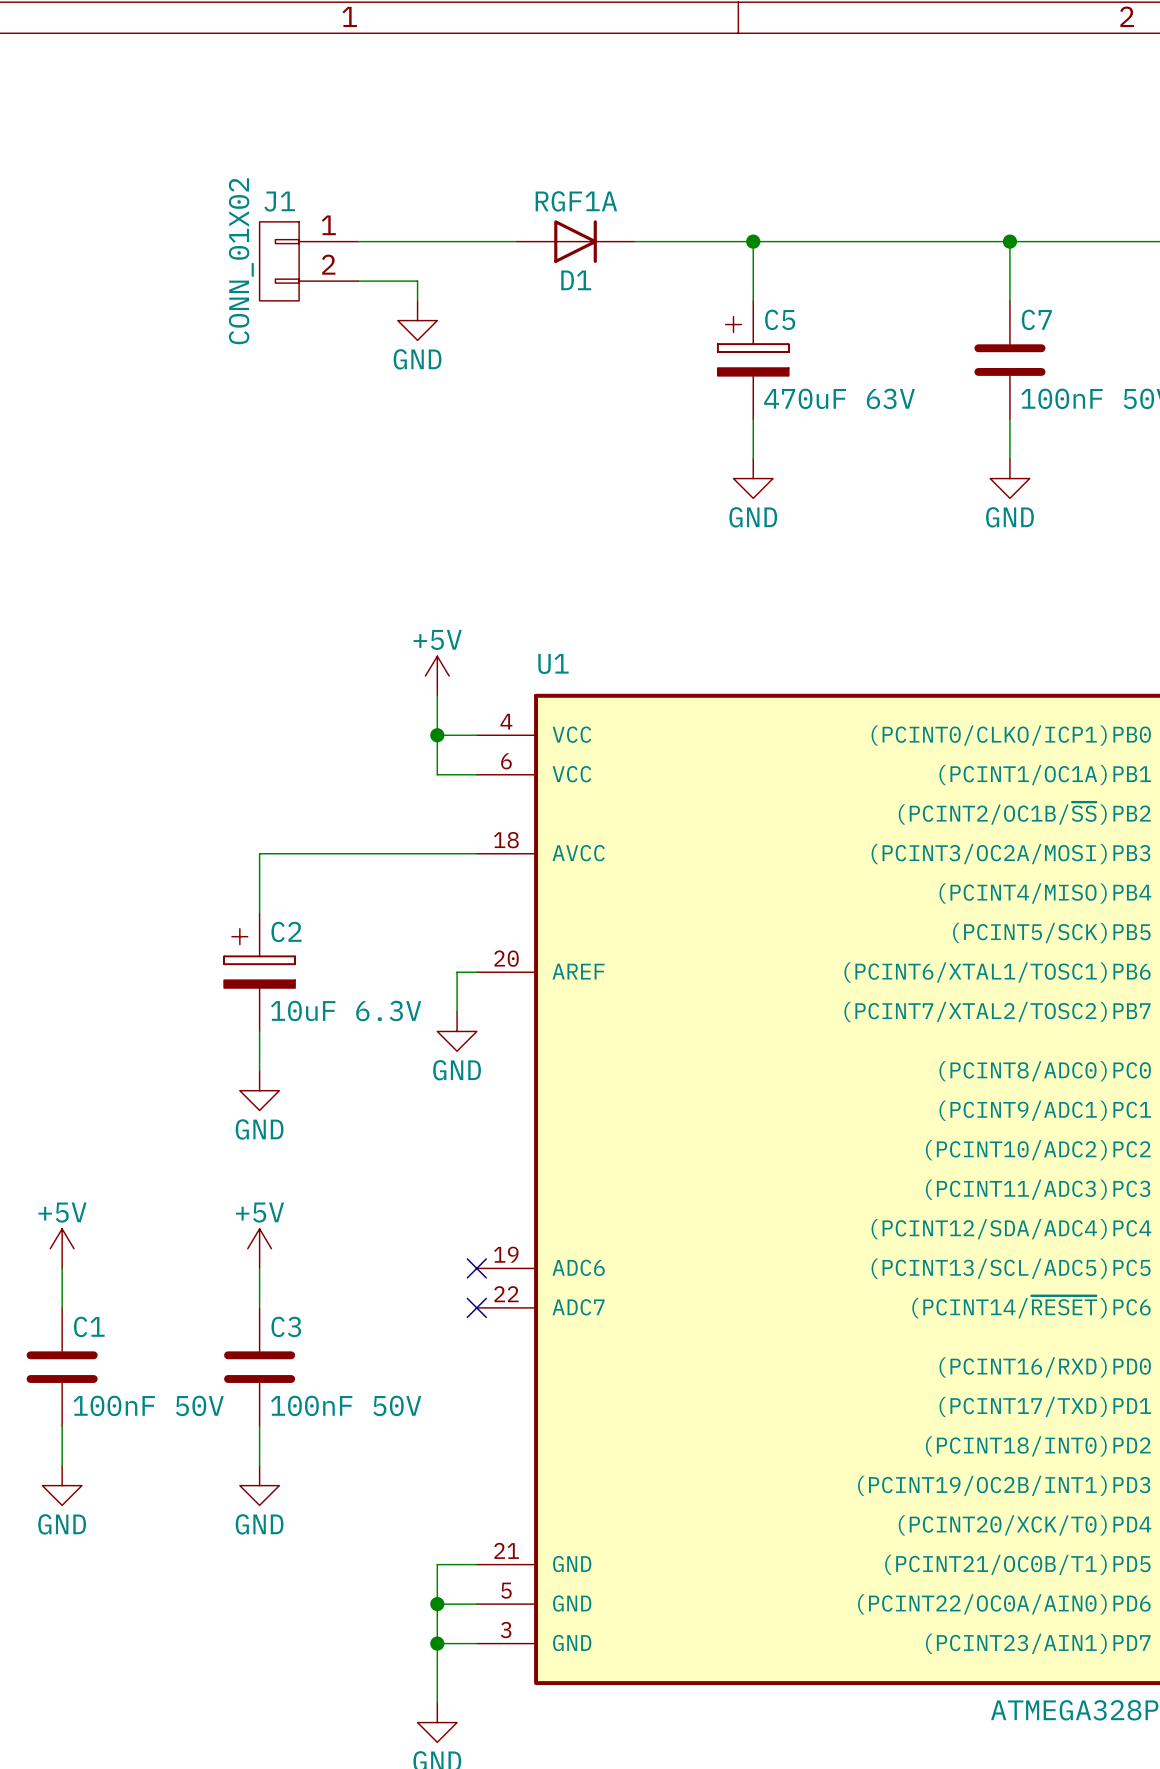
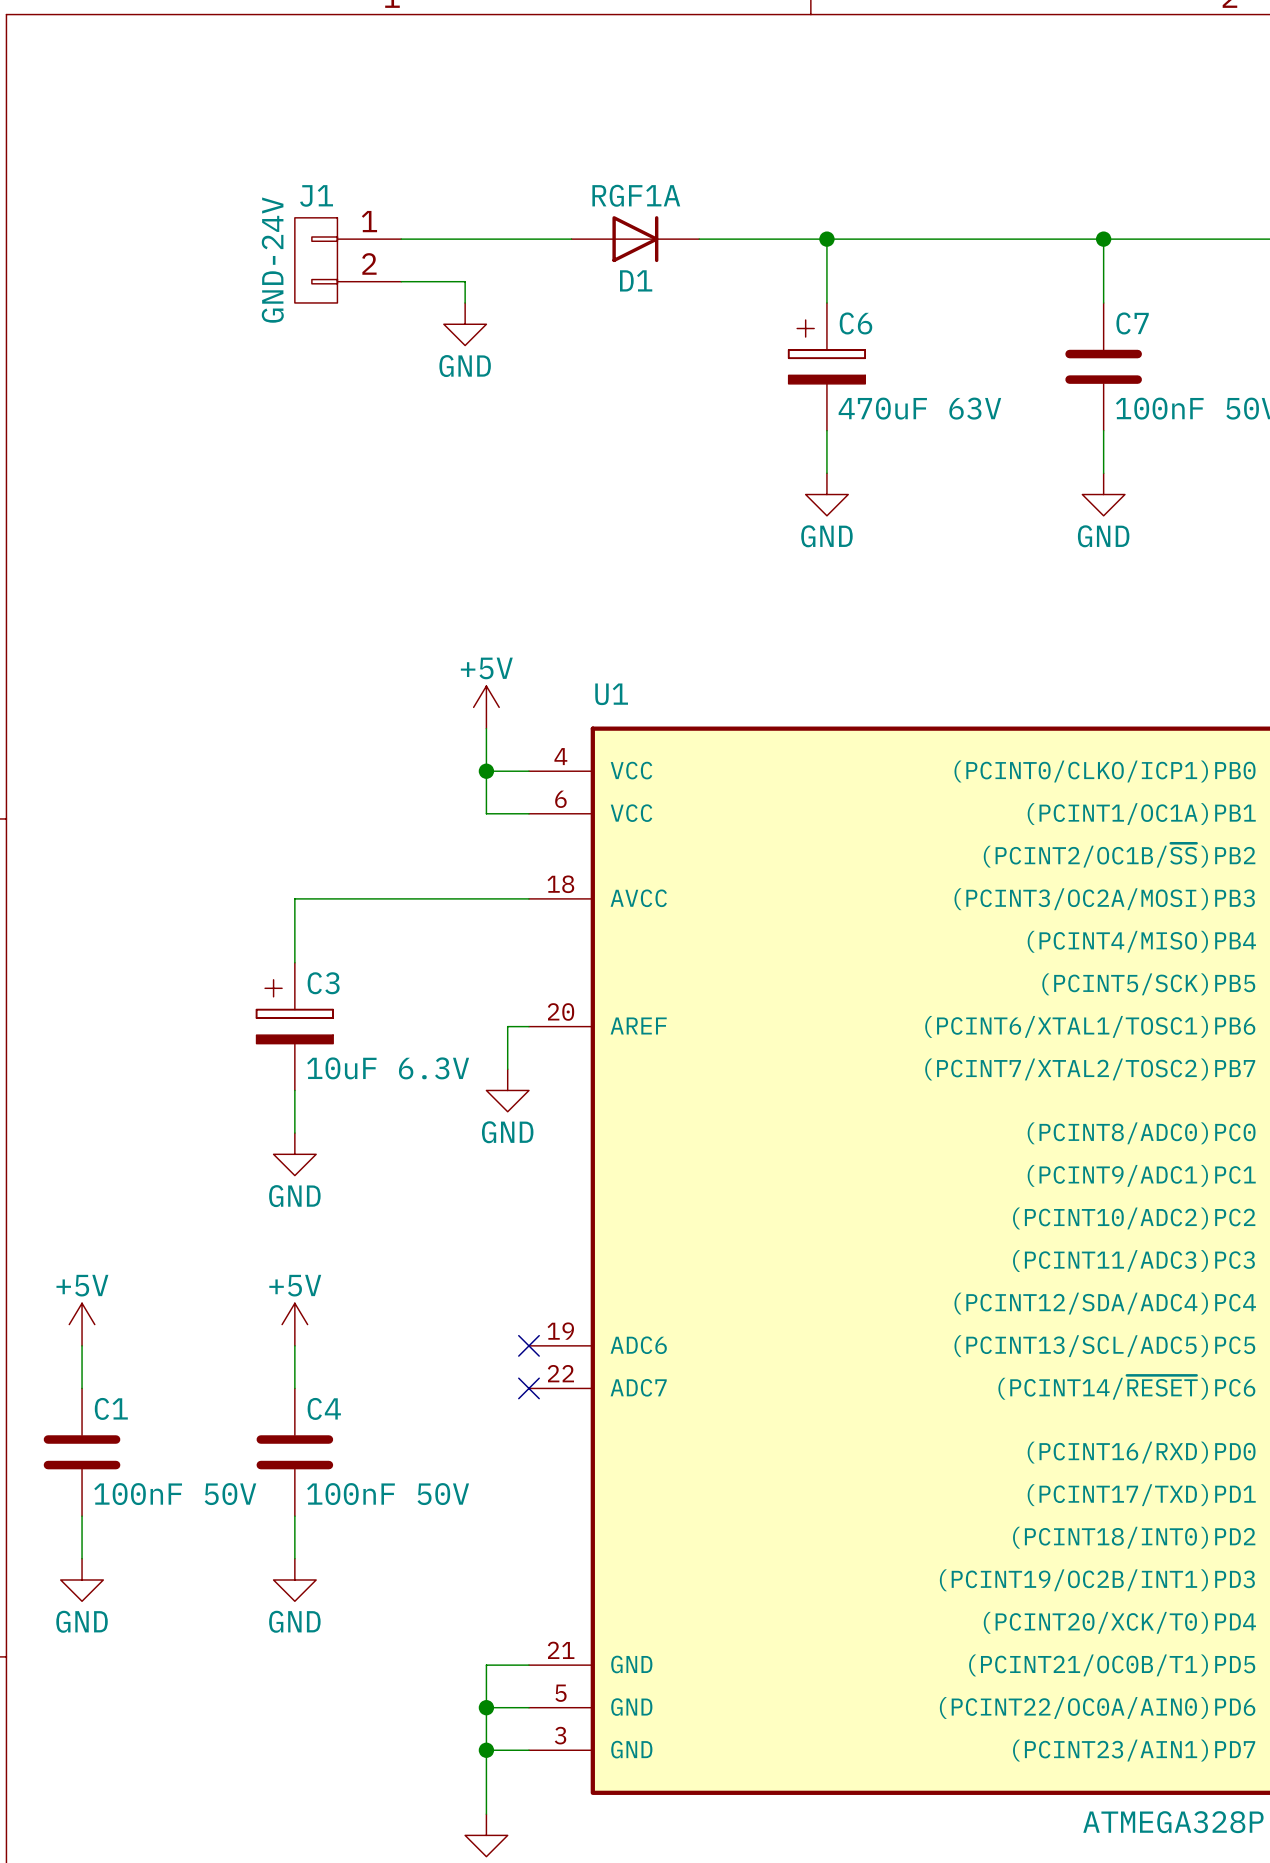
J1 value: CONN_01X02 (241, 261) -> GND-24V (272, 260)
C5 name: C5 (780, 319) -> C6 (855, 323)
C2 name: C2 (286, 932) -> C3 (323, 983)
C3 name: C3 (286, 1326) -> C4 (324, 1408)

